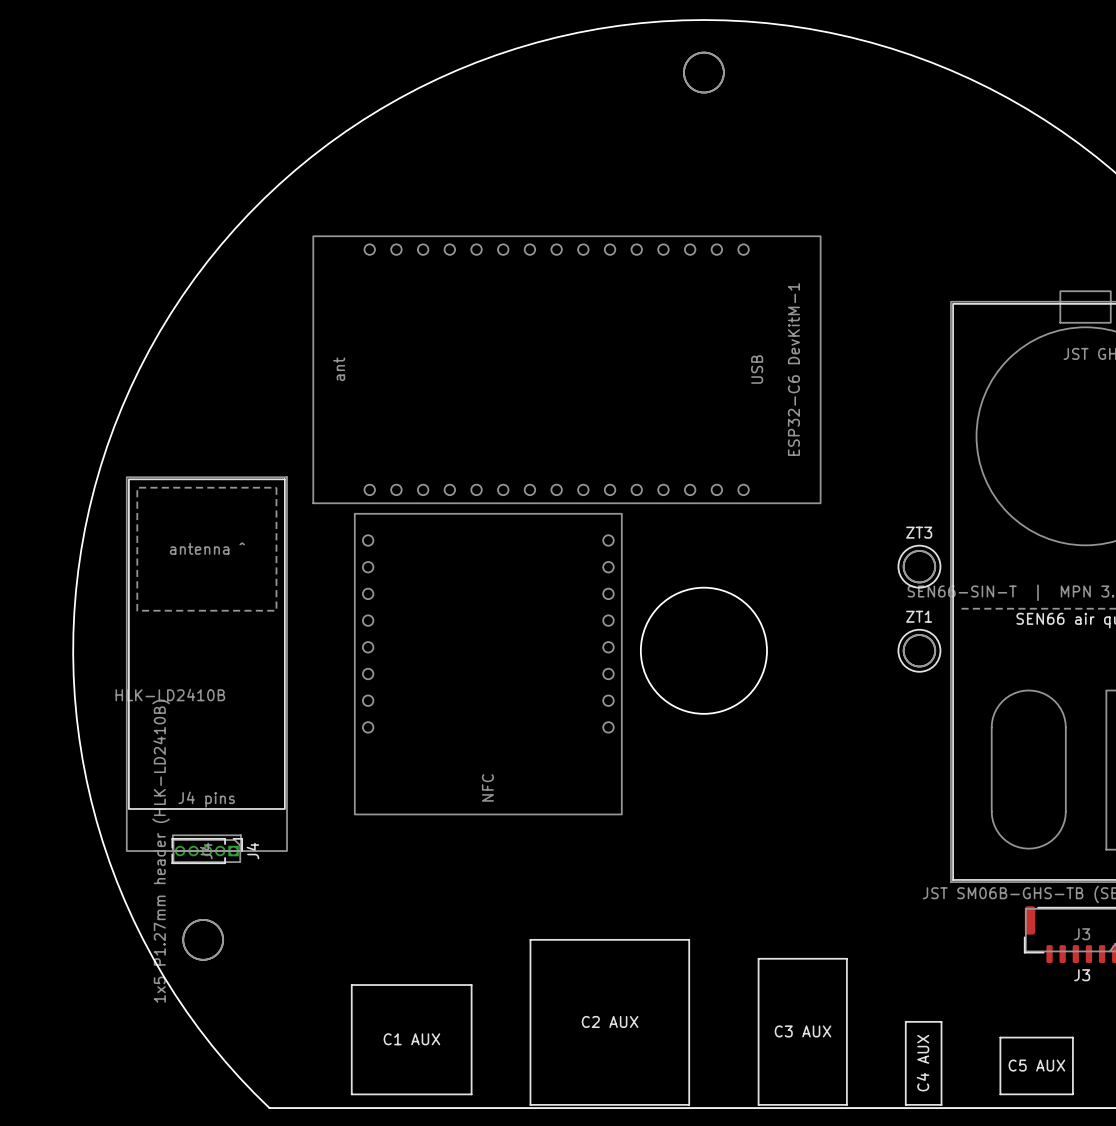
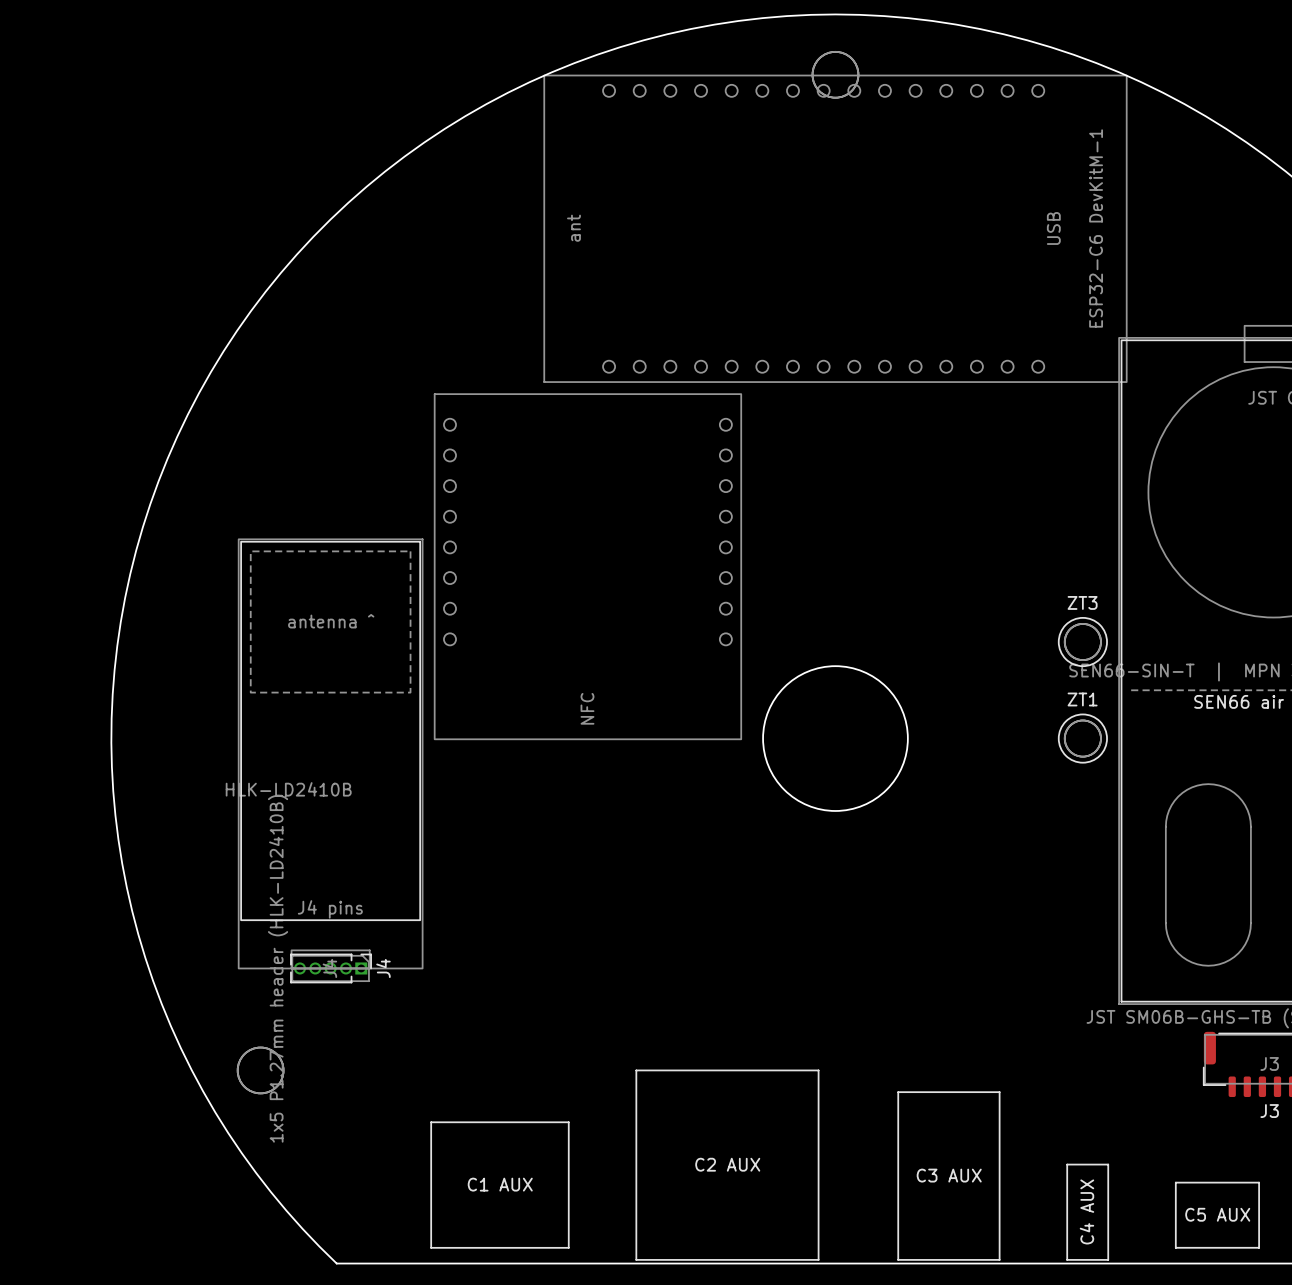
drawing position: (566, 369) -> (835, 228)
drawing position: (206, 664) -> (330, 753)
drawing position: (488, 664) -> (587, 566)
J4 position: (207, 851) -> (331, 968)

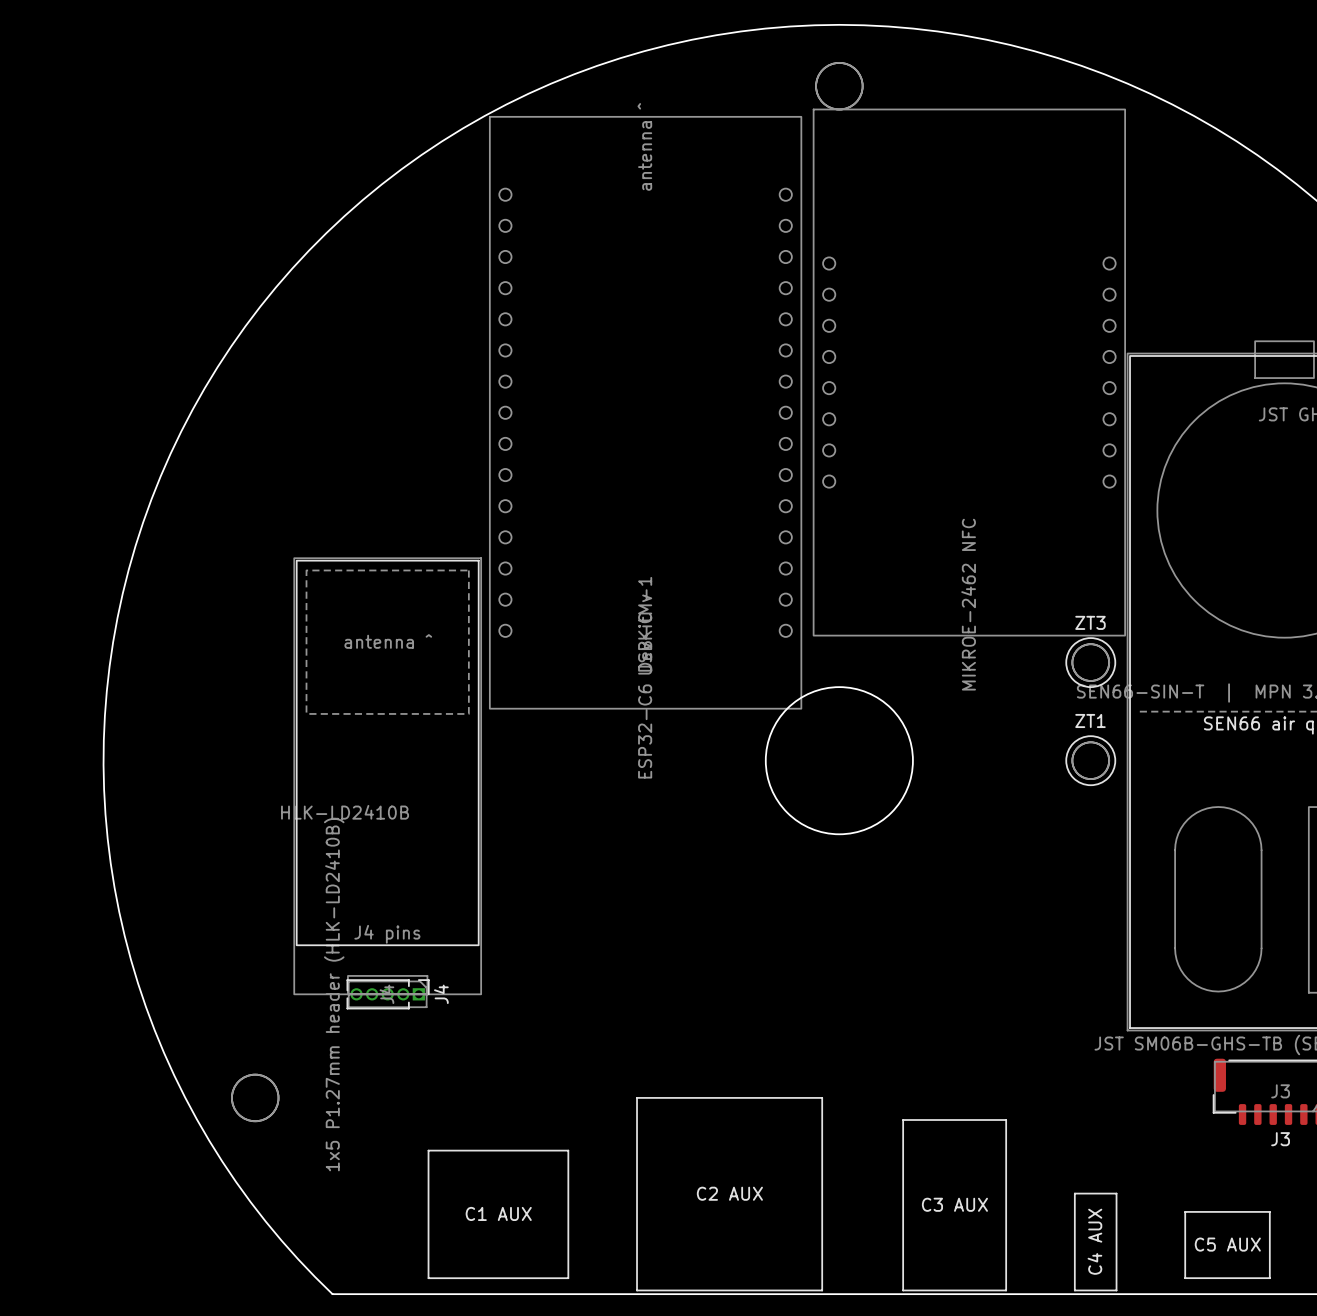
drawing: [434, 74, 1128, 740] -> none
drawing: none -> [489, 108, 1126, 710]
drawing position: (330, 753) -> (387, 776)
J4 position: (331, 968) -> (388, 994)

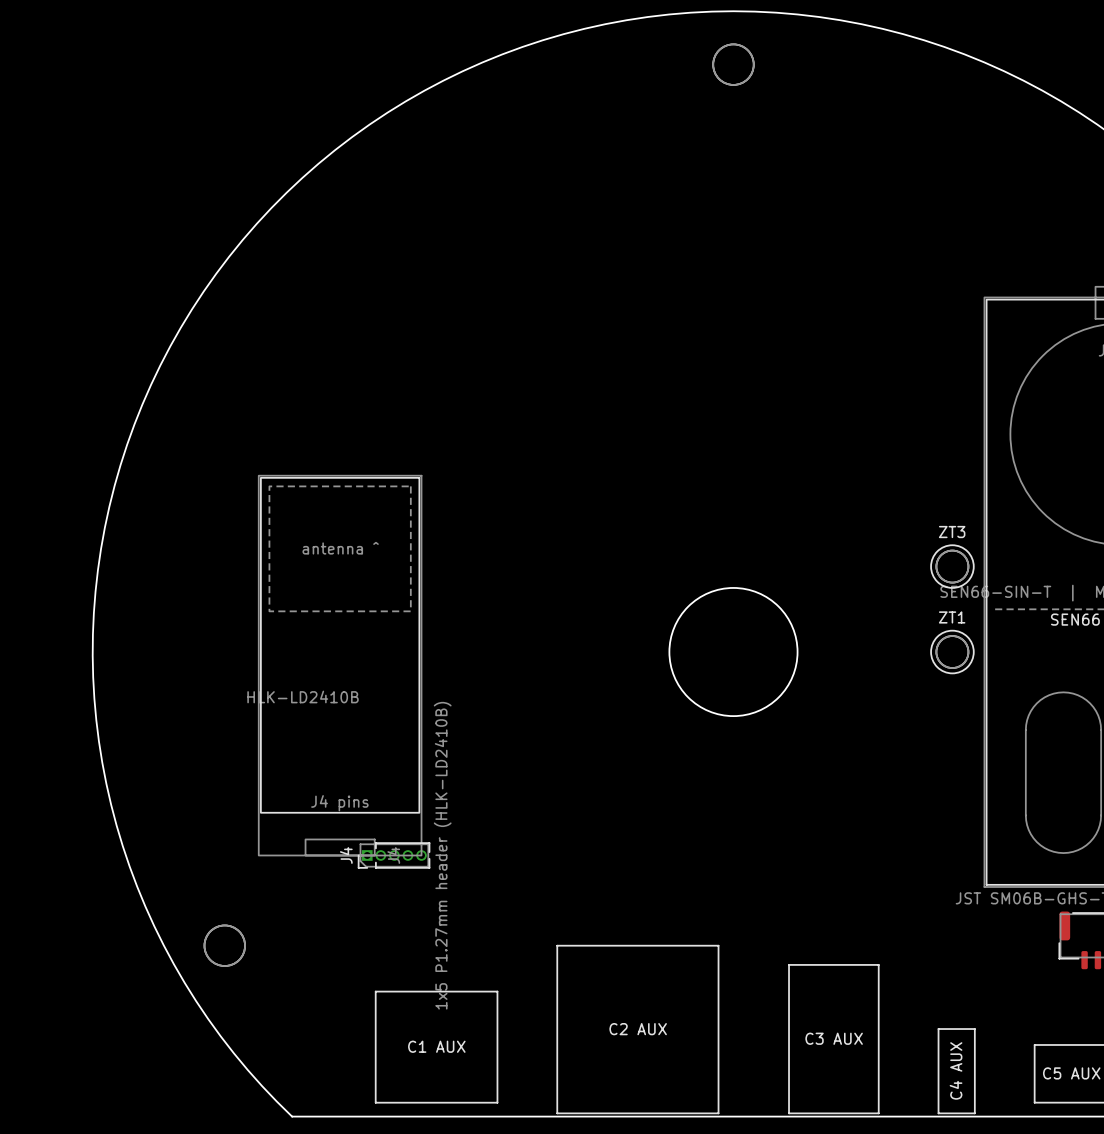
drawing: [489, 108, 1126, 710] -> none
J4 rotation: 0° (388, 994) -> 180° (394, 855)
J4 position: (388, 994) -> (394, 855)

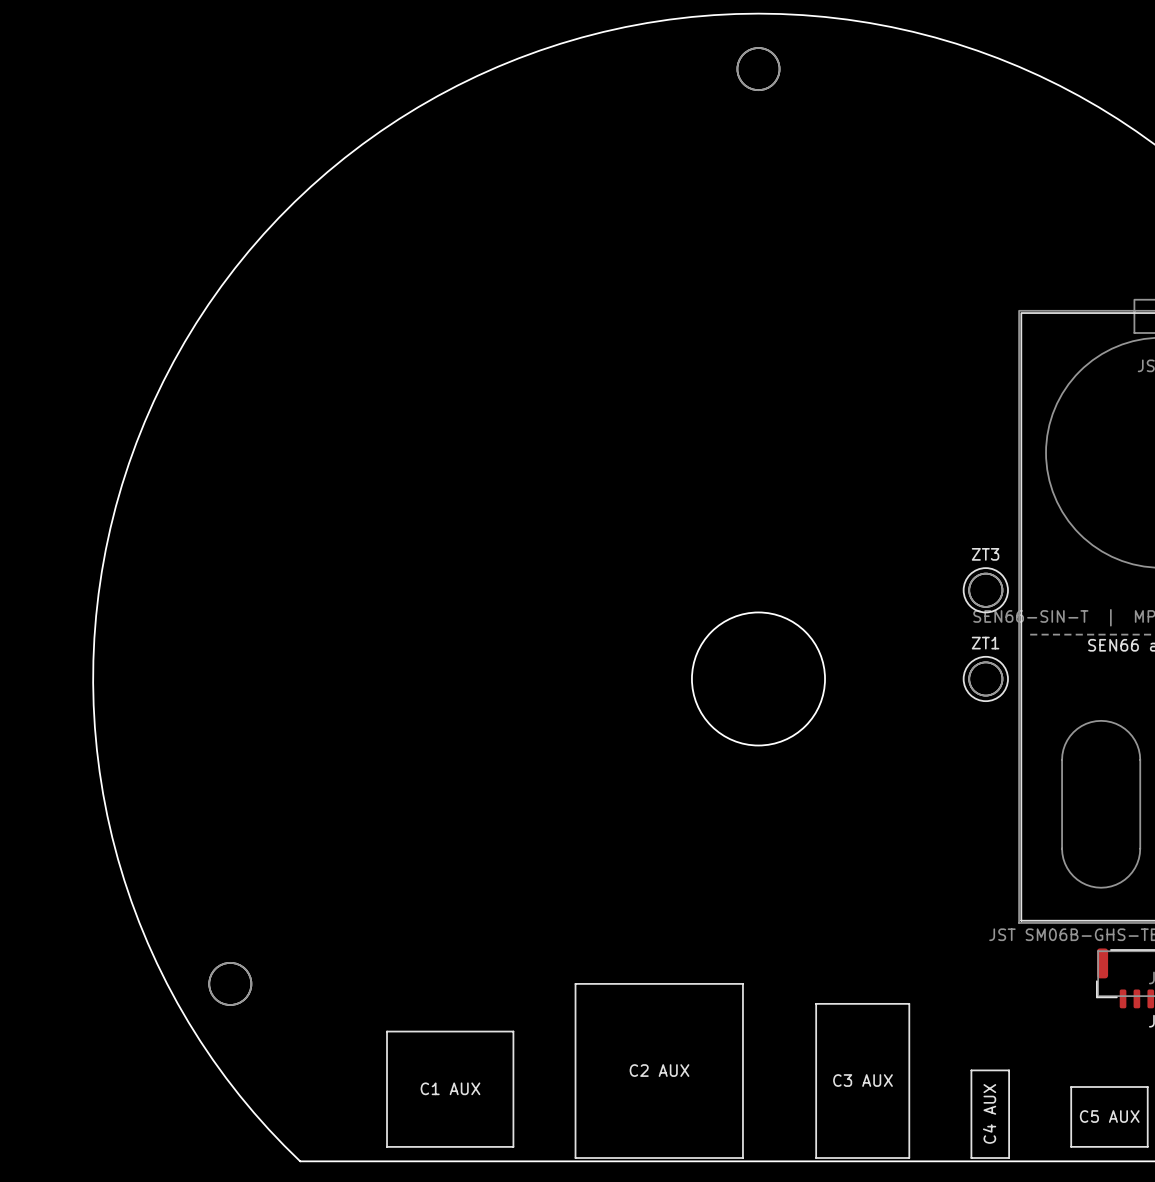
drawing: [258, 475, 423, 857] -> none
J4: 1x5 P1.27mm header (HLK-LD2410B) (394, 855) -> none

